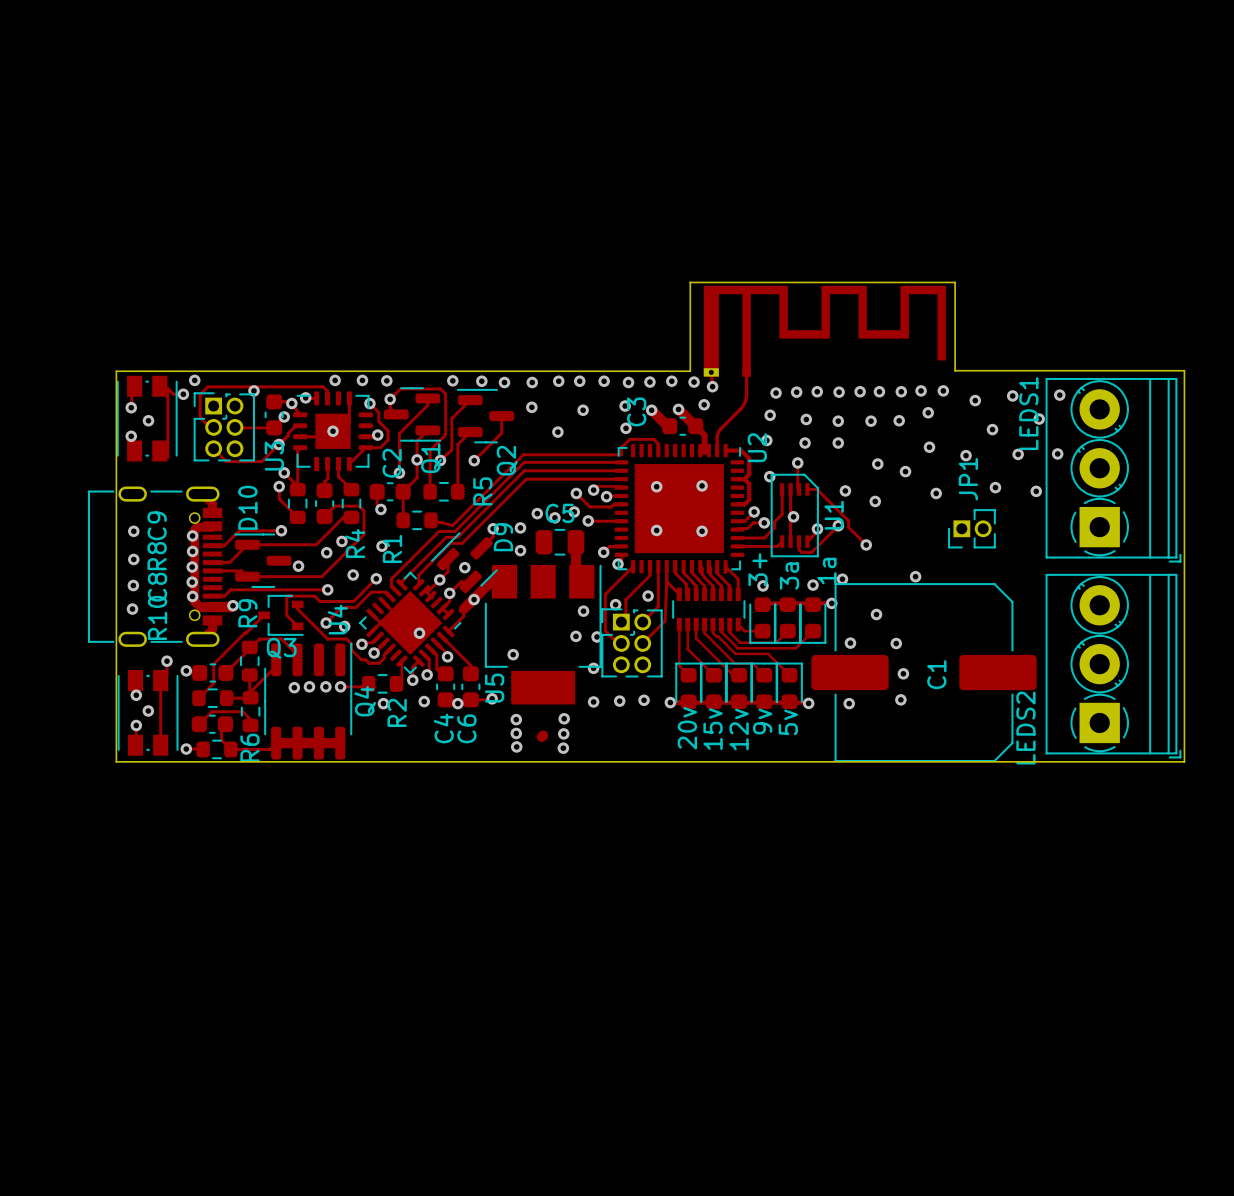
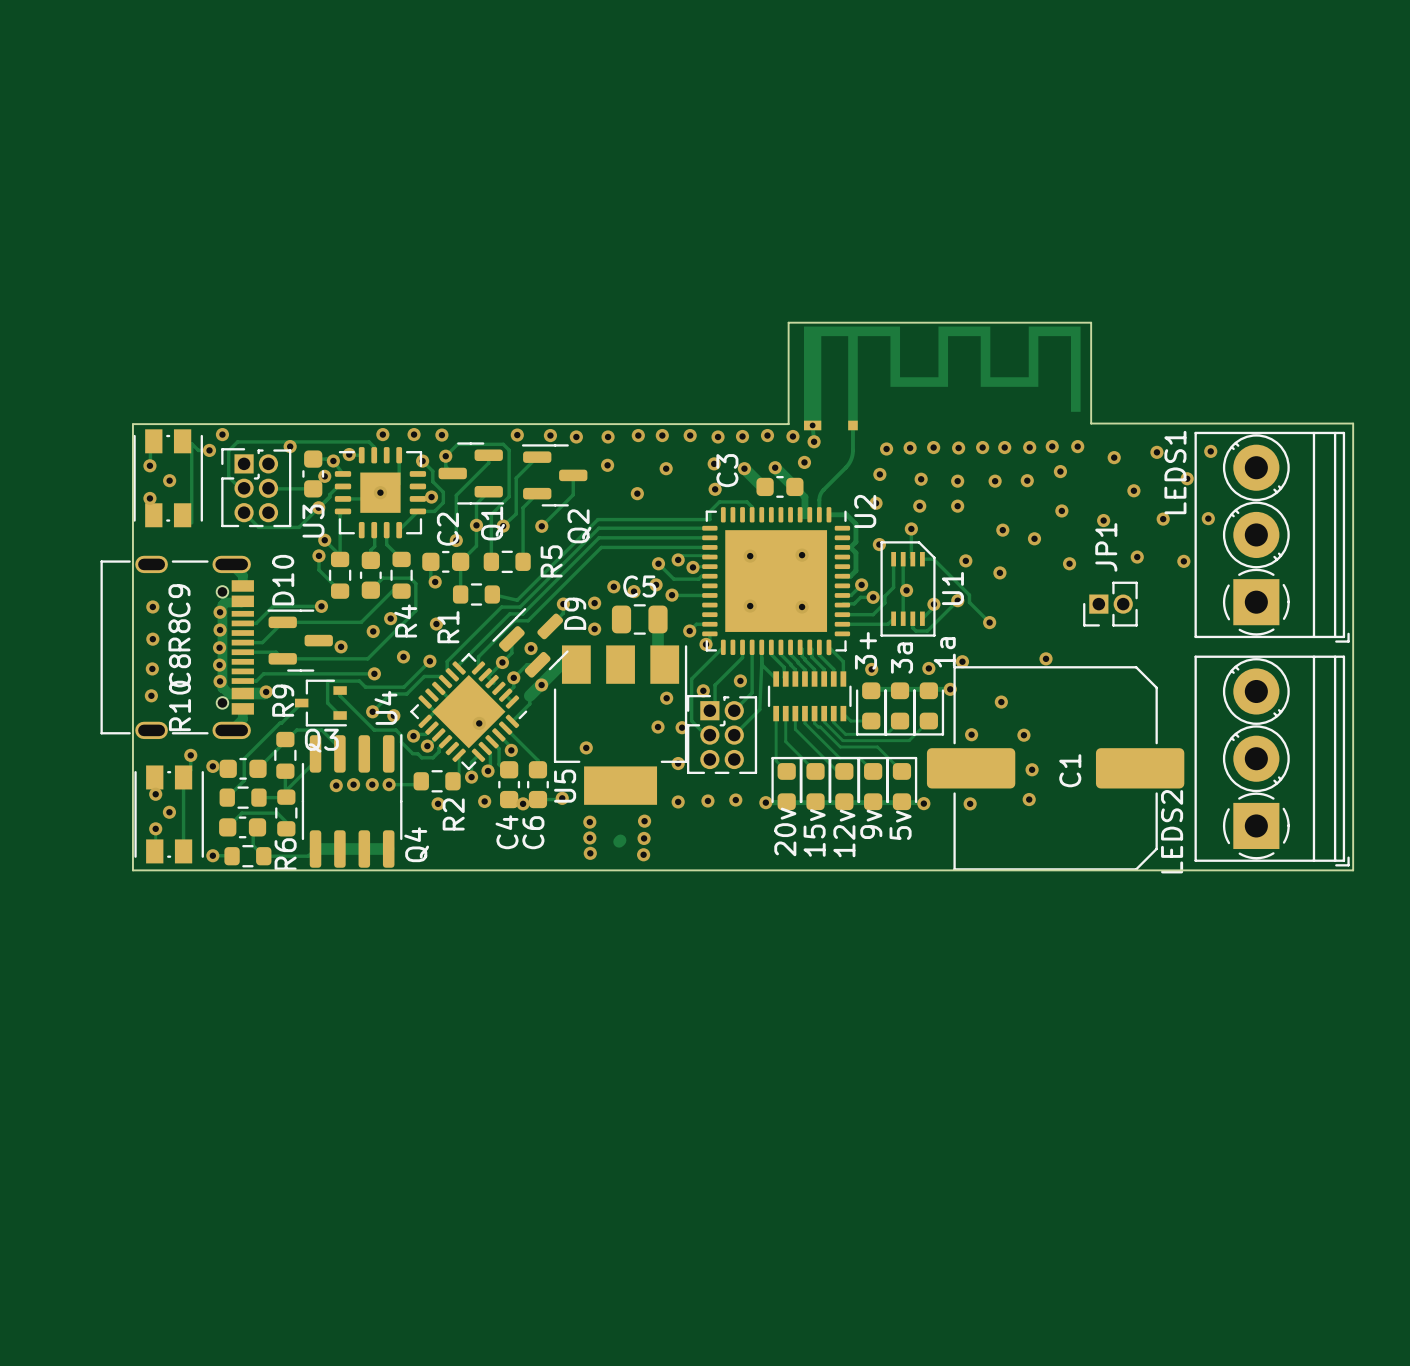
Q4 name position: Q4 (365, 701) -> Q4 (416, 844)

